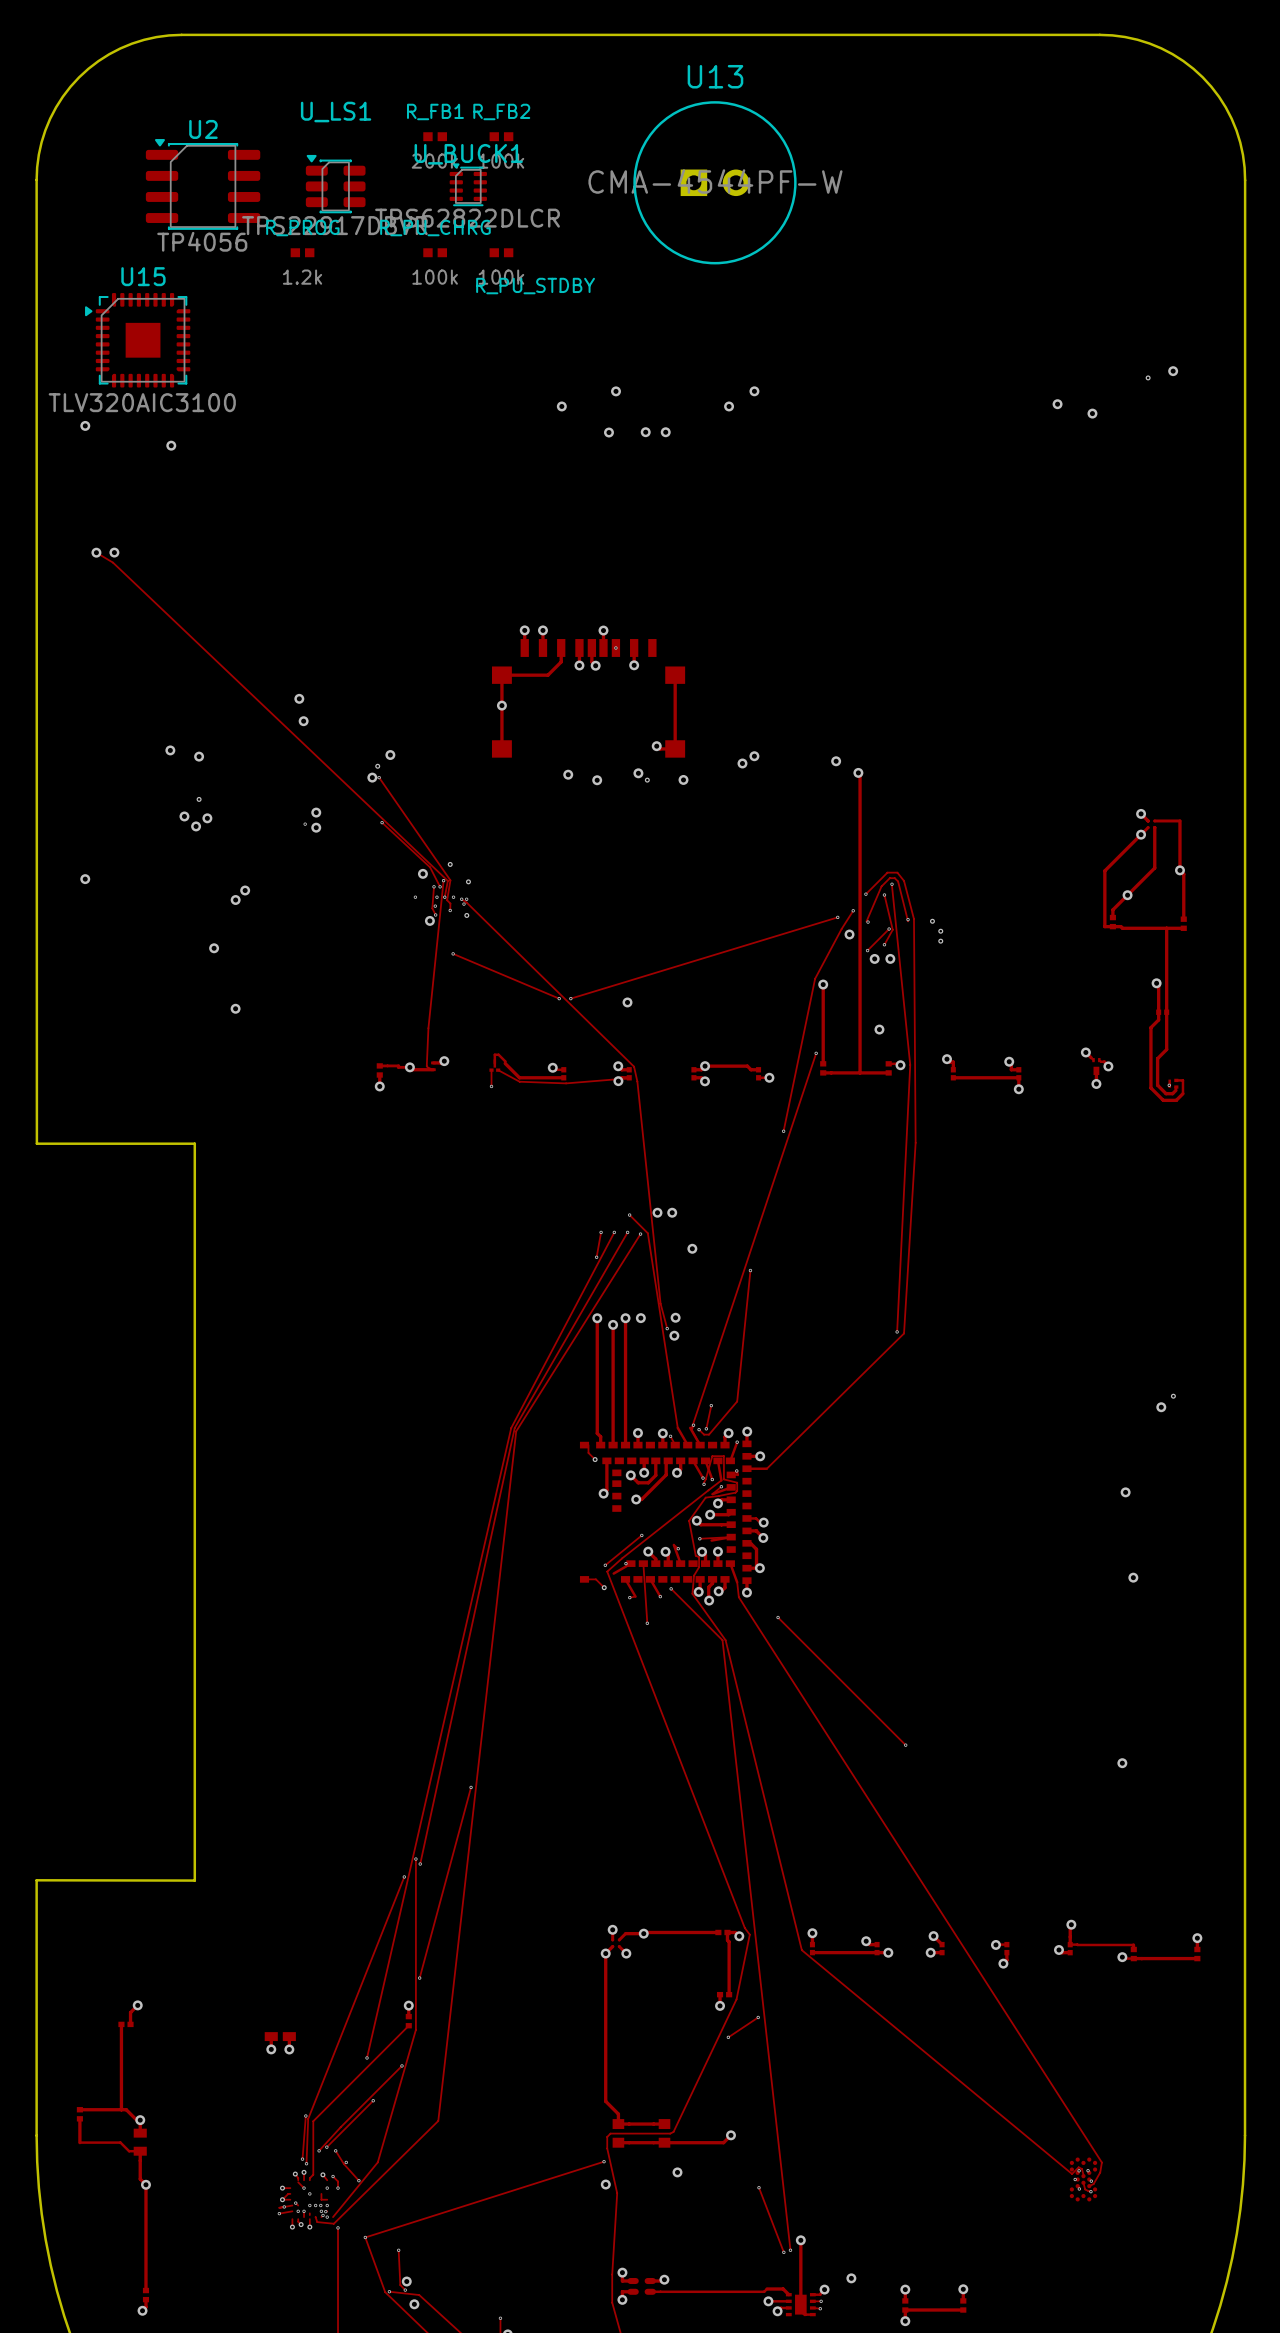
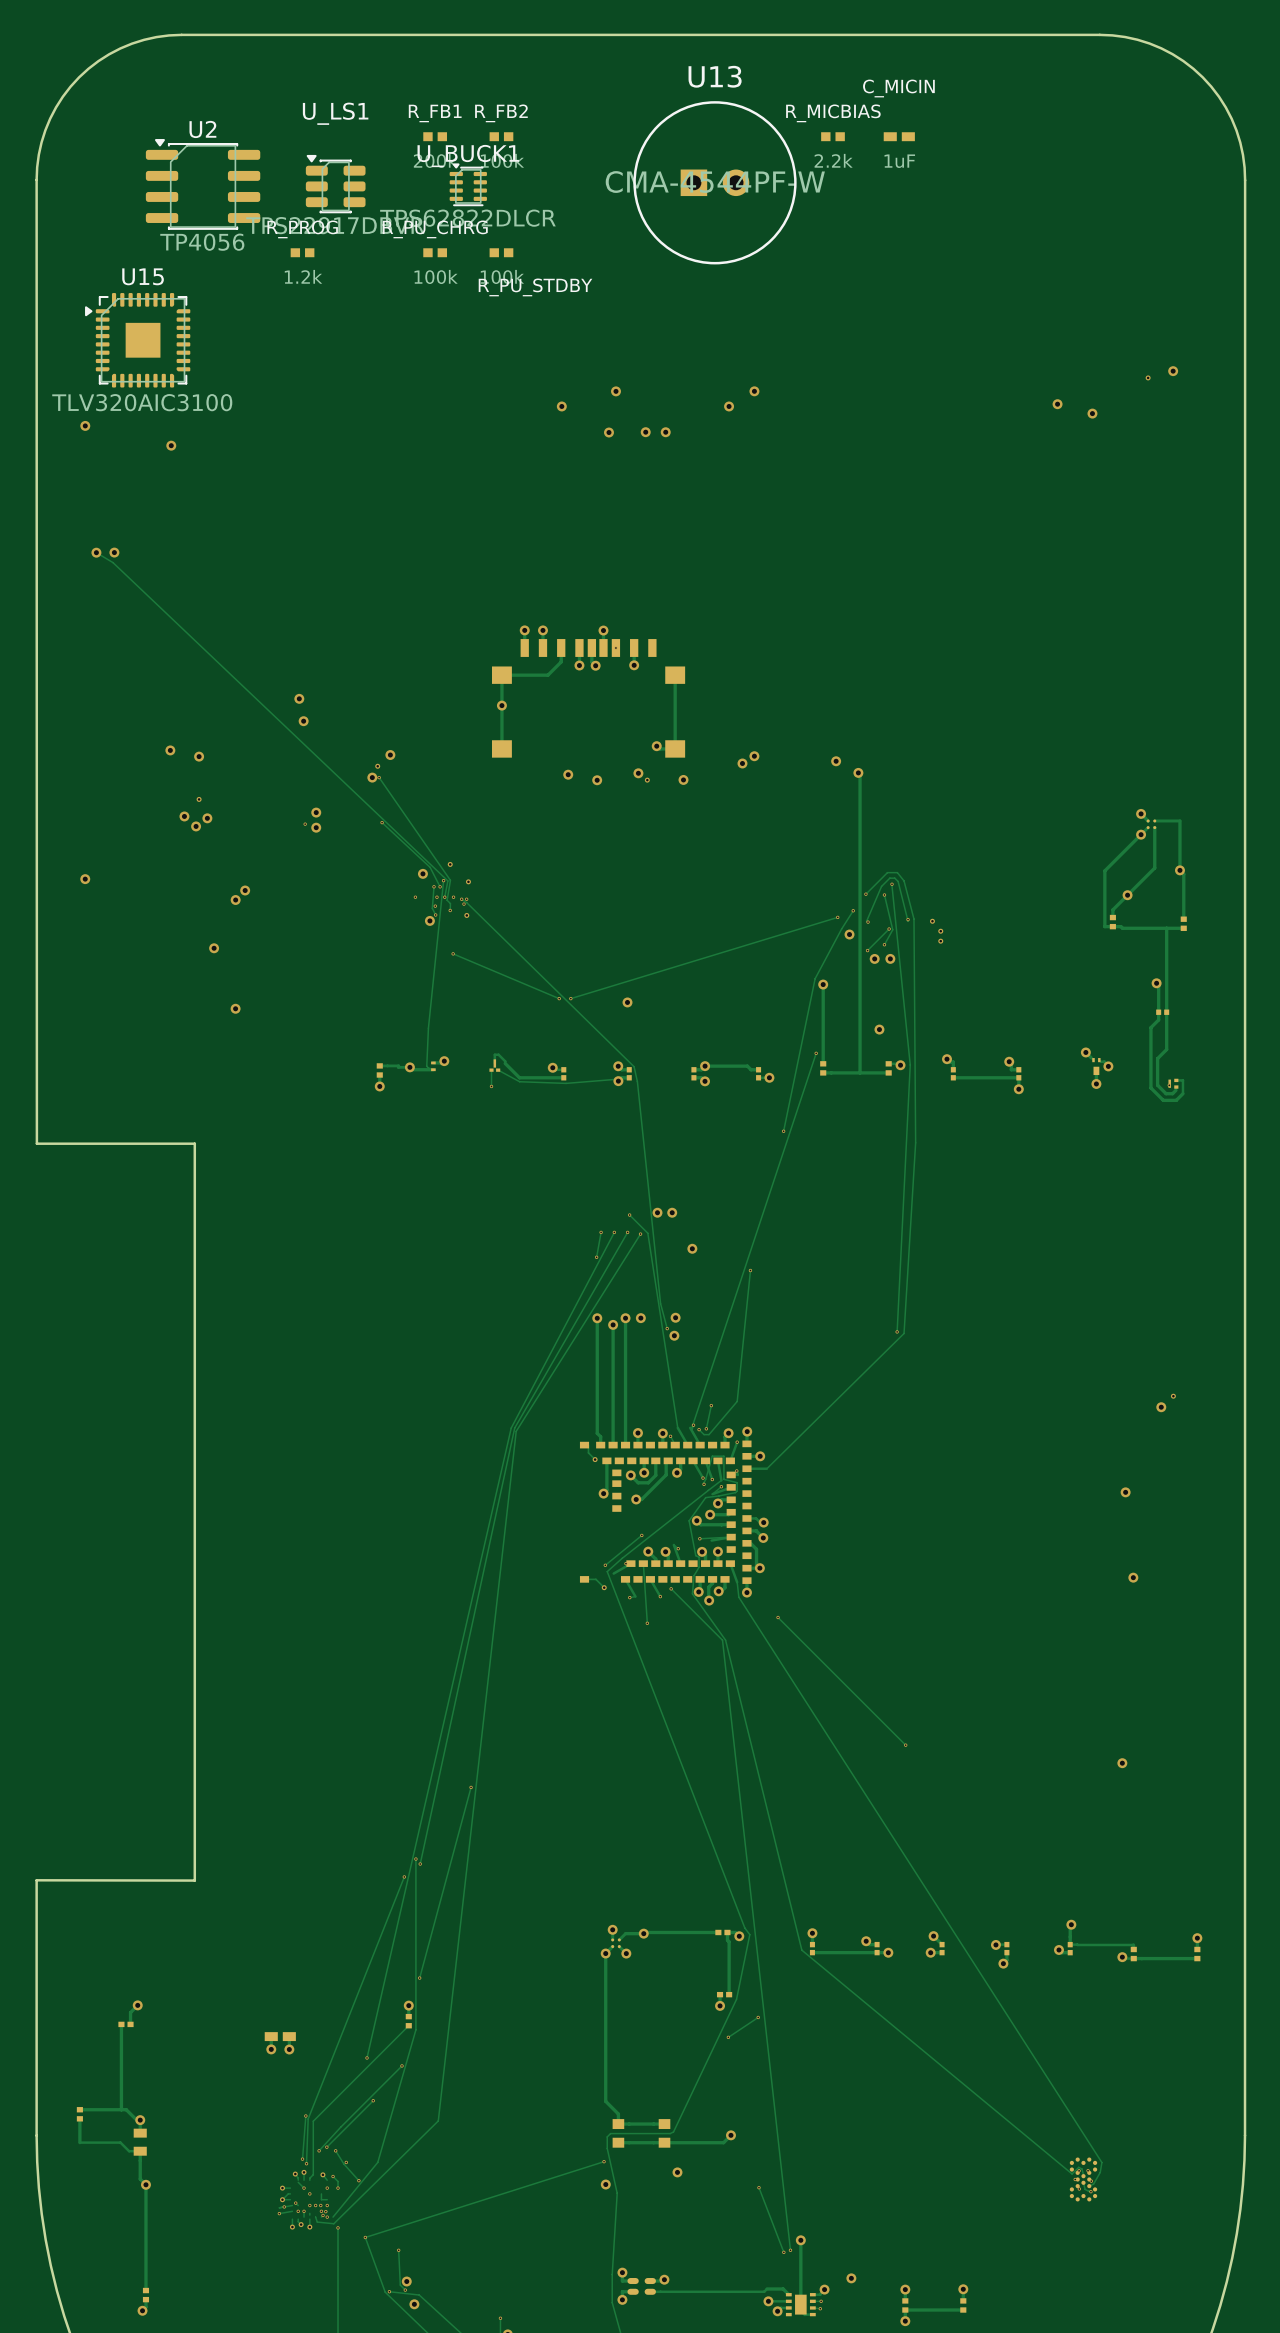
R_MICBIAS: none -> 2.2k (833, 136)
C_MICIN: none -> 1uF (899, 136)

